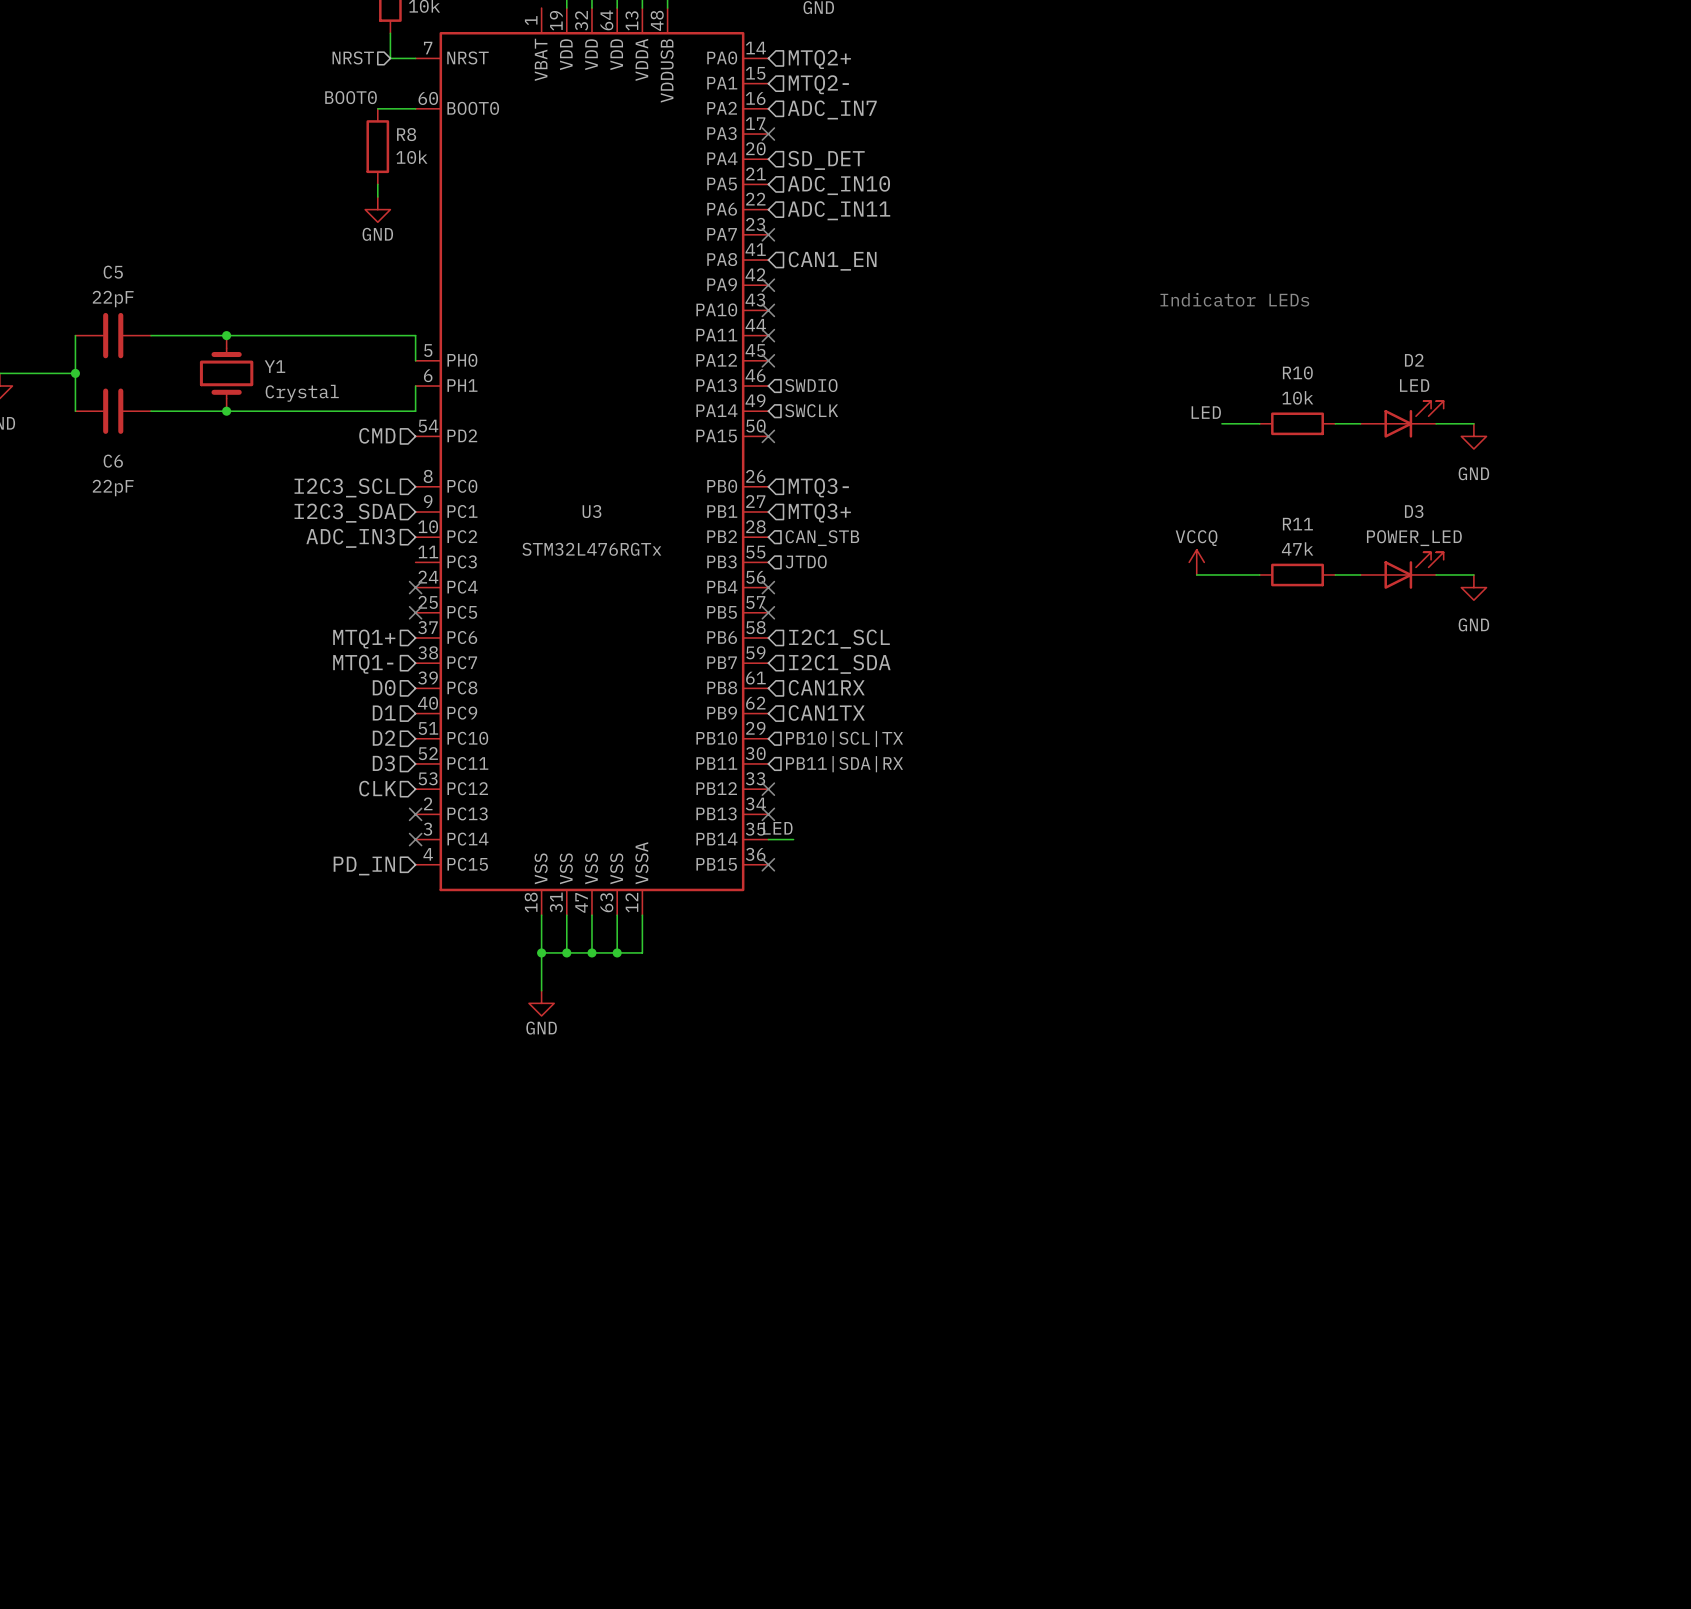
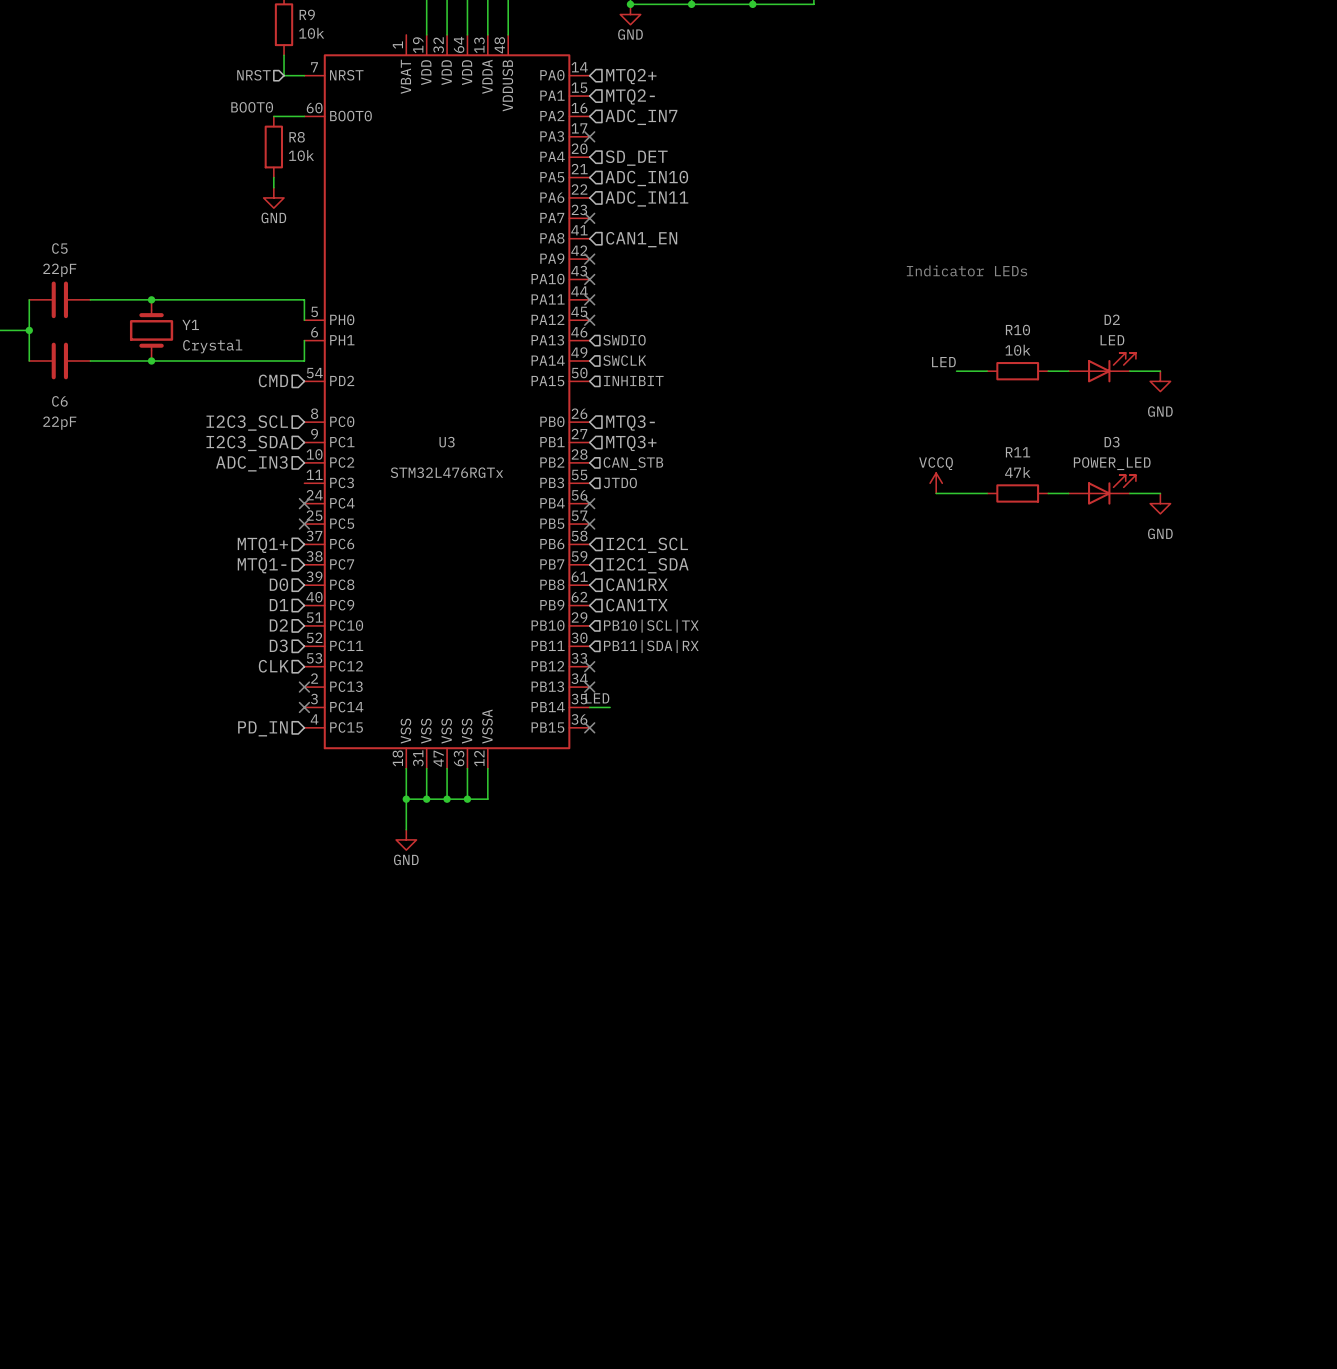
hierarchical label: none -> INHIBIT (633, 380)
no-connect mark: (768, 436) -> none

